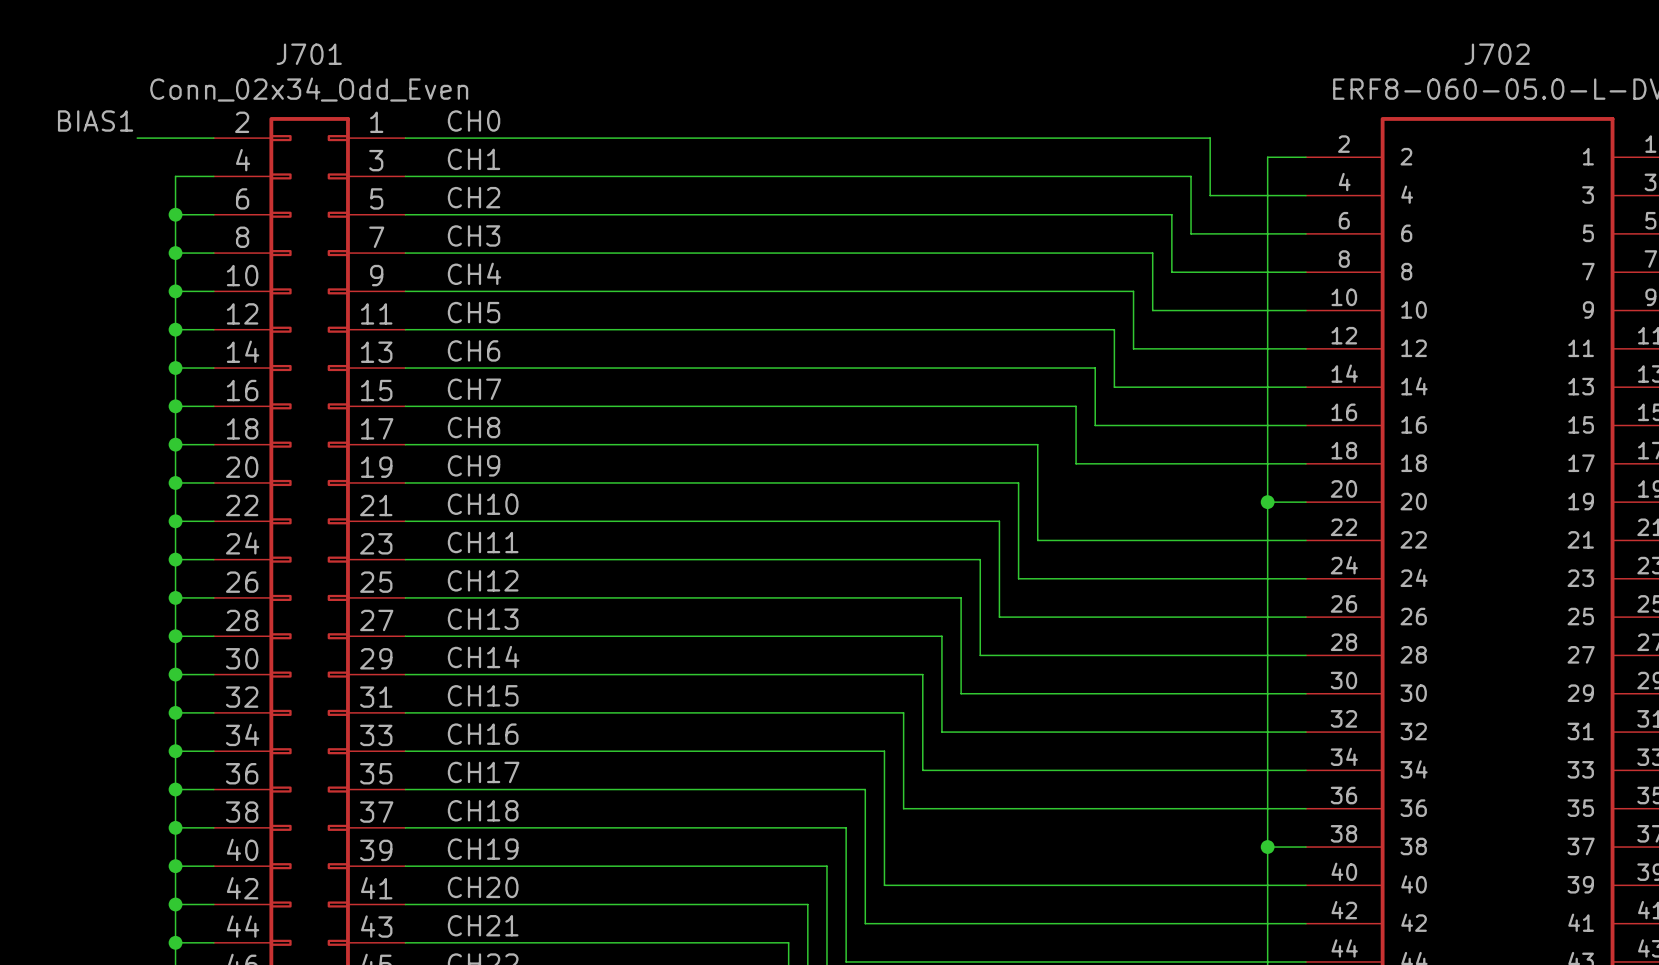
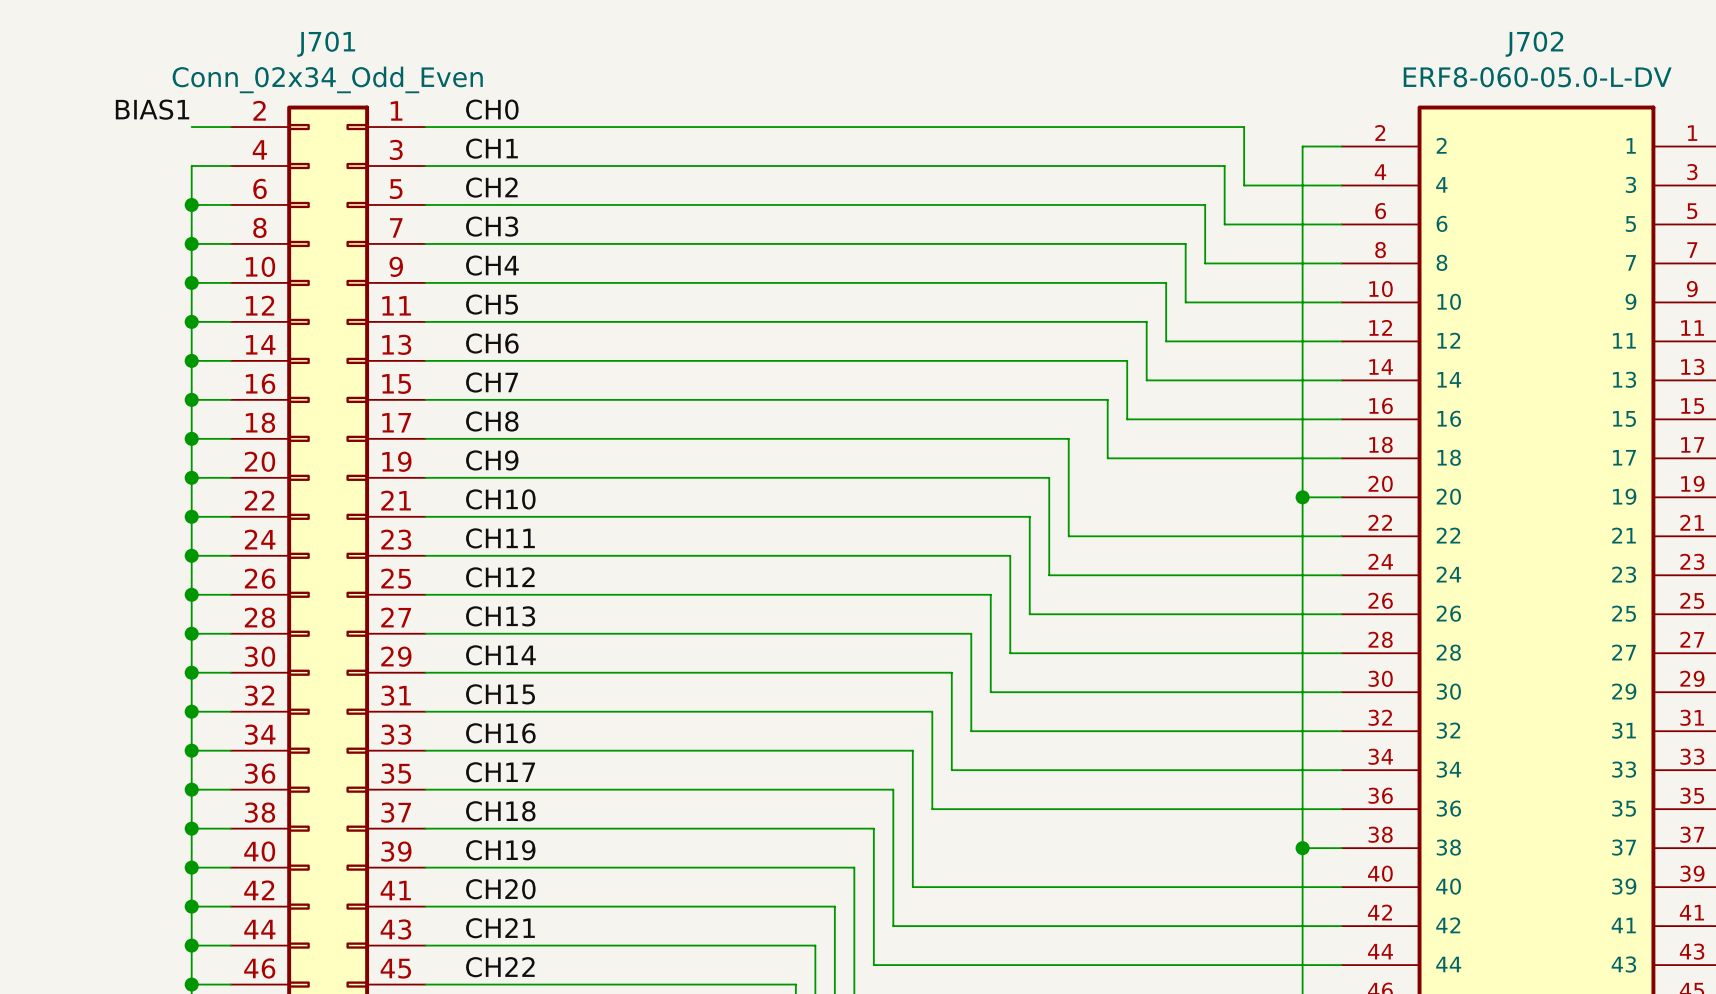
label position: BIAS1 (95, 121) -> BIAS1 (152, 109)
wire: (137, 138) (175, 138) -> none

